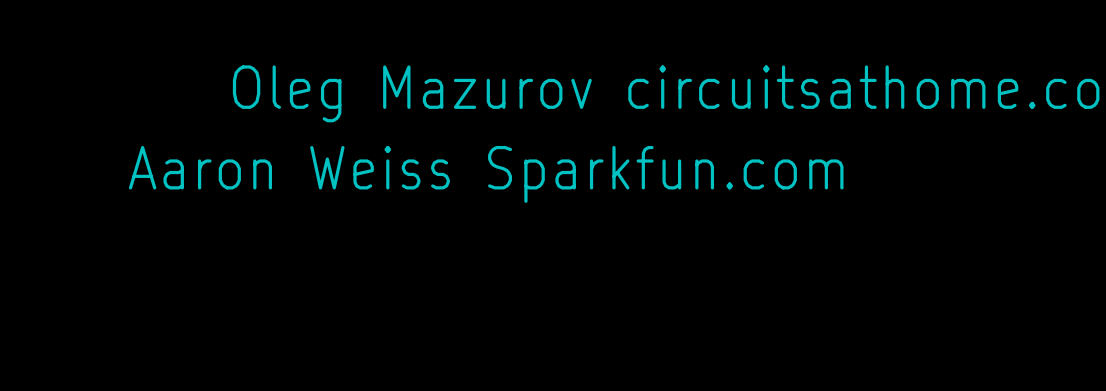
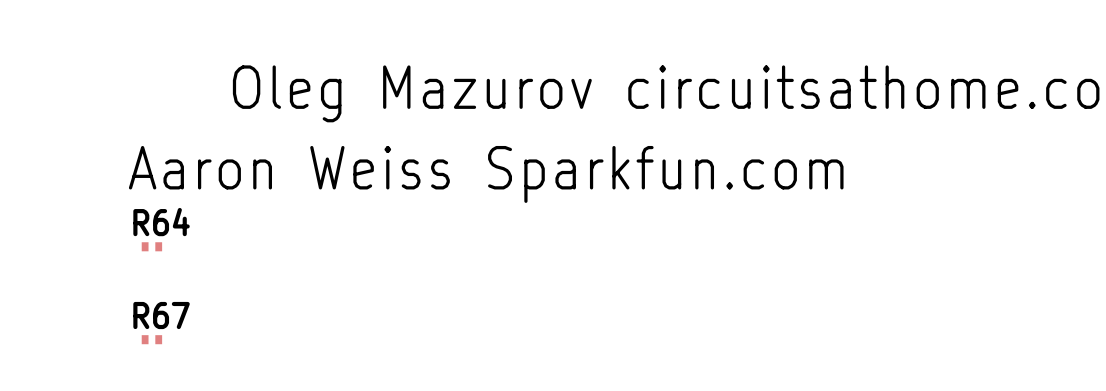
R64: none -> (151, 246)
R67: none -> (151, 339)

